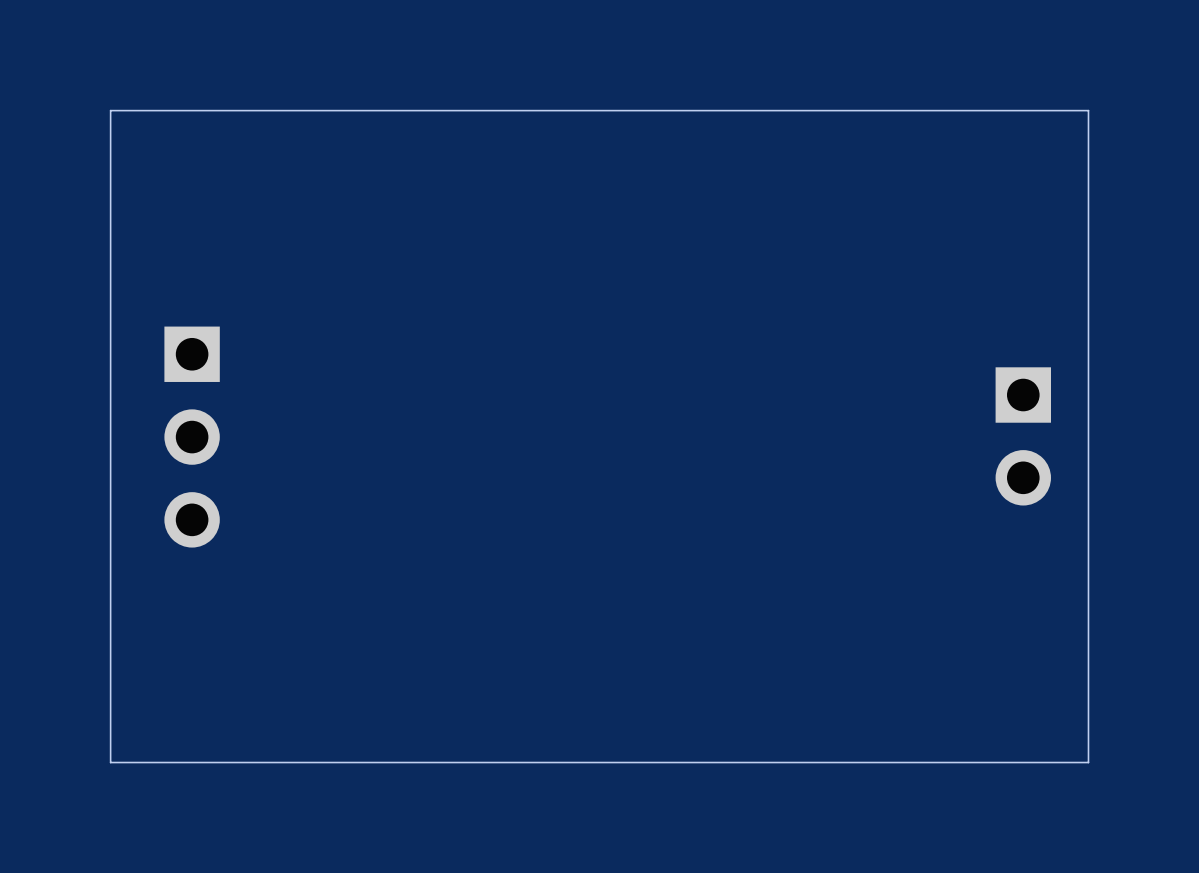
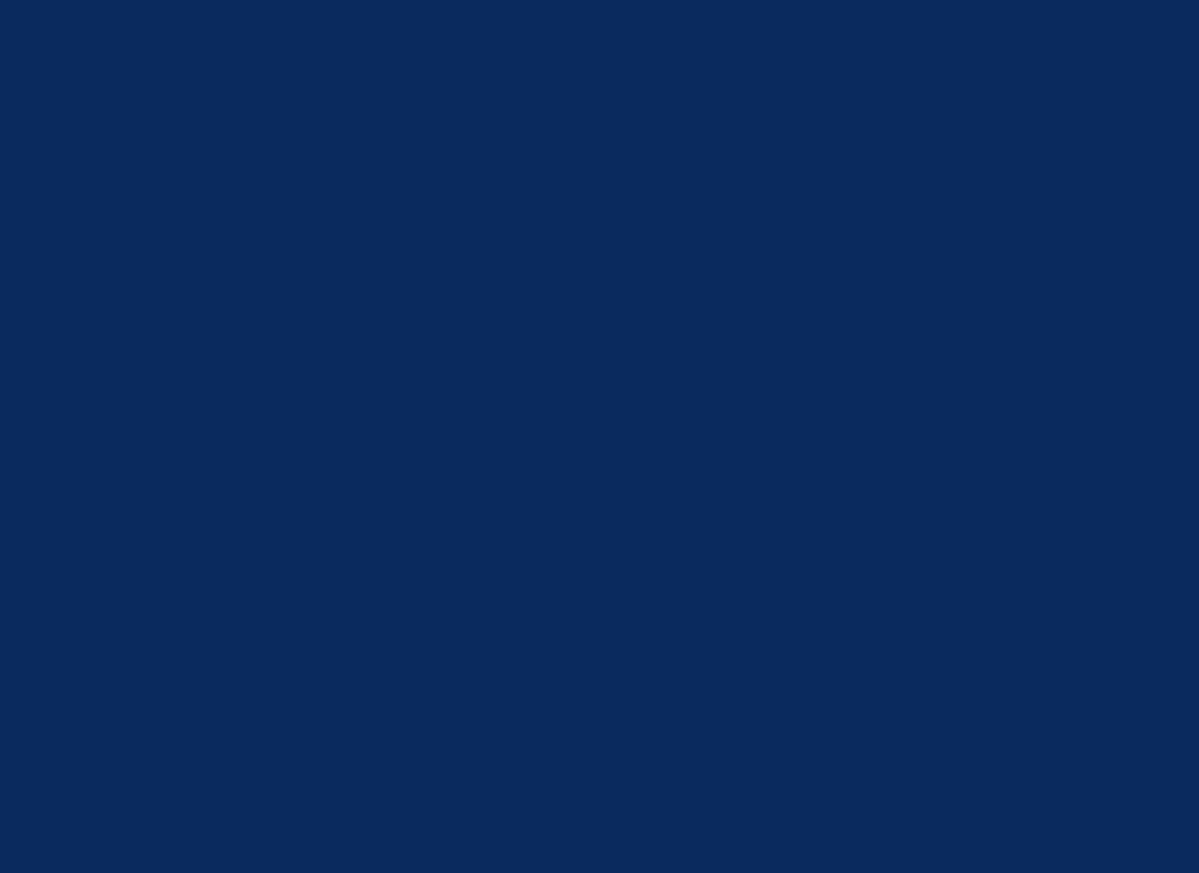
board edge: (1088, 110) (110, 110) (110, 762) (1088, 762) (1088, 110) -> none
part: (1023, 436) -> none
part: (192, 437) -> none

